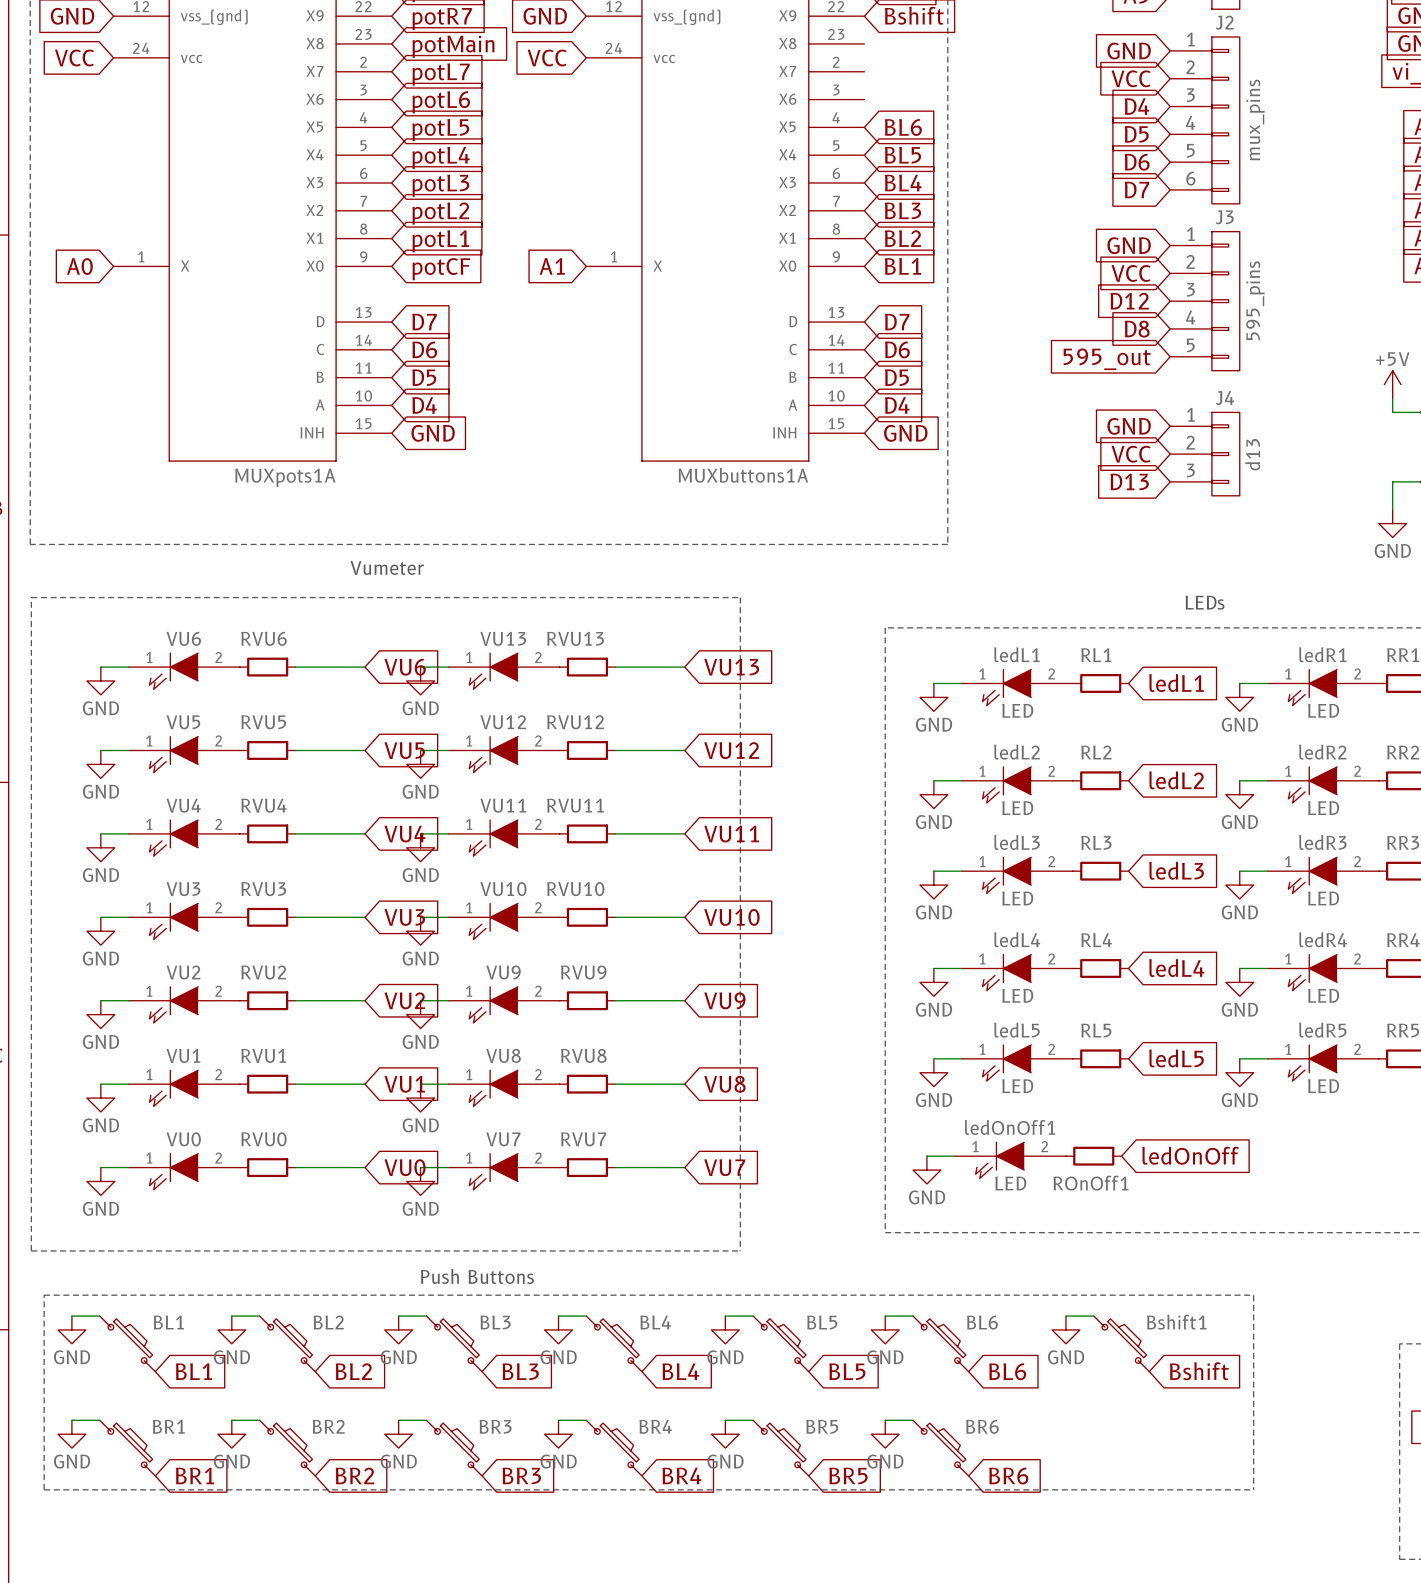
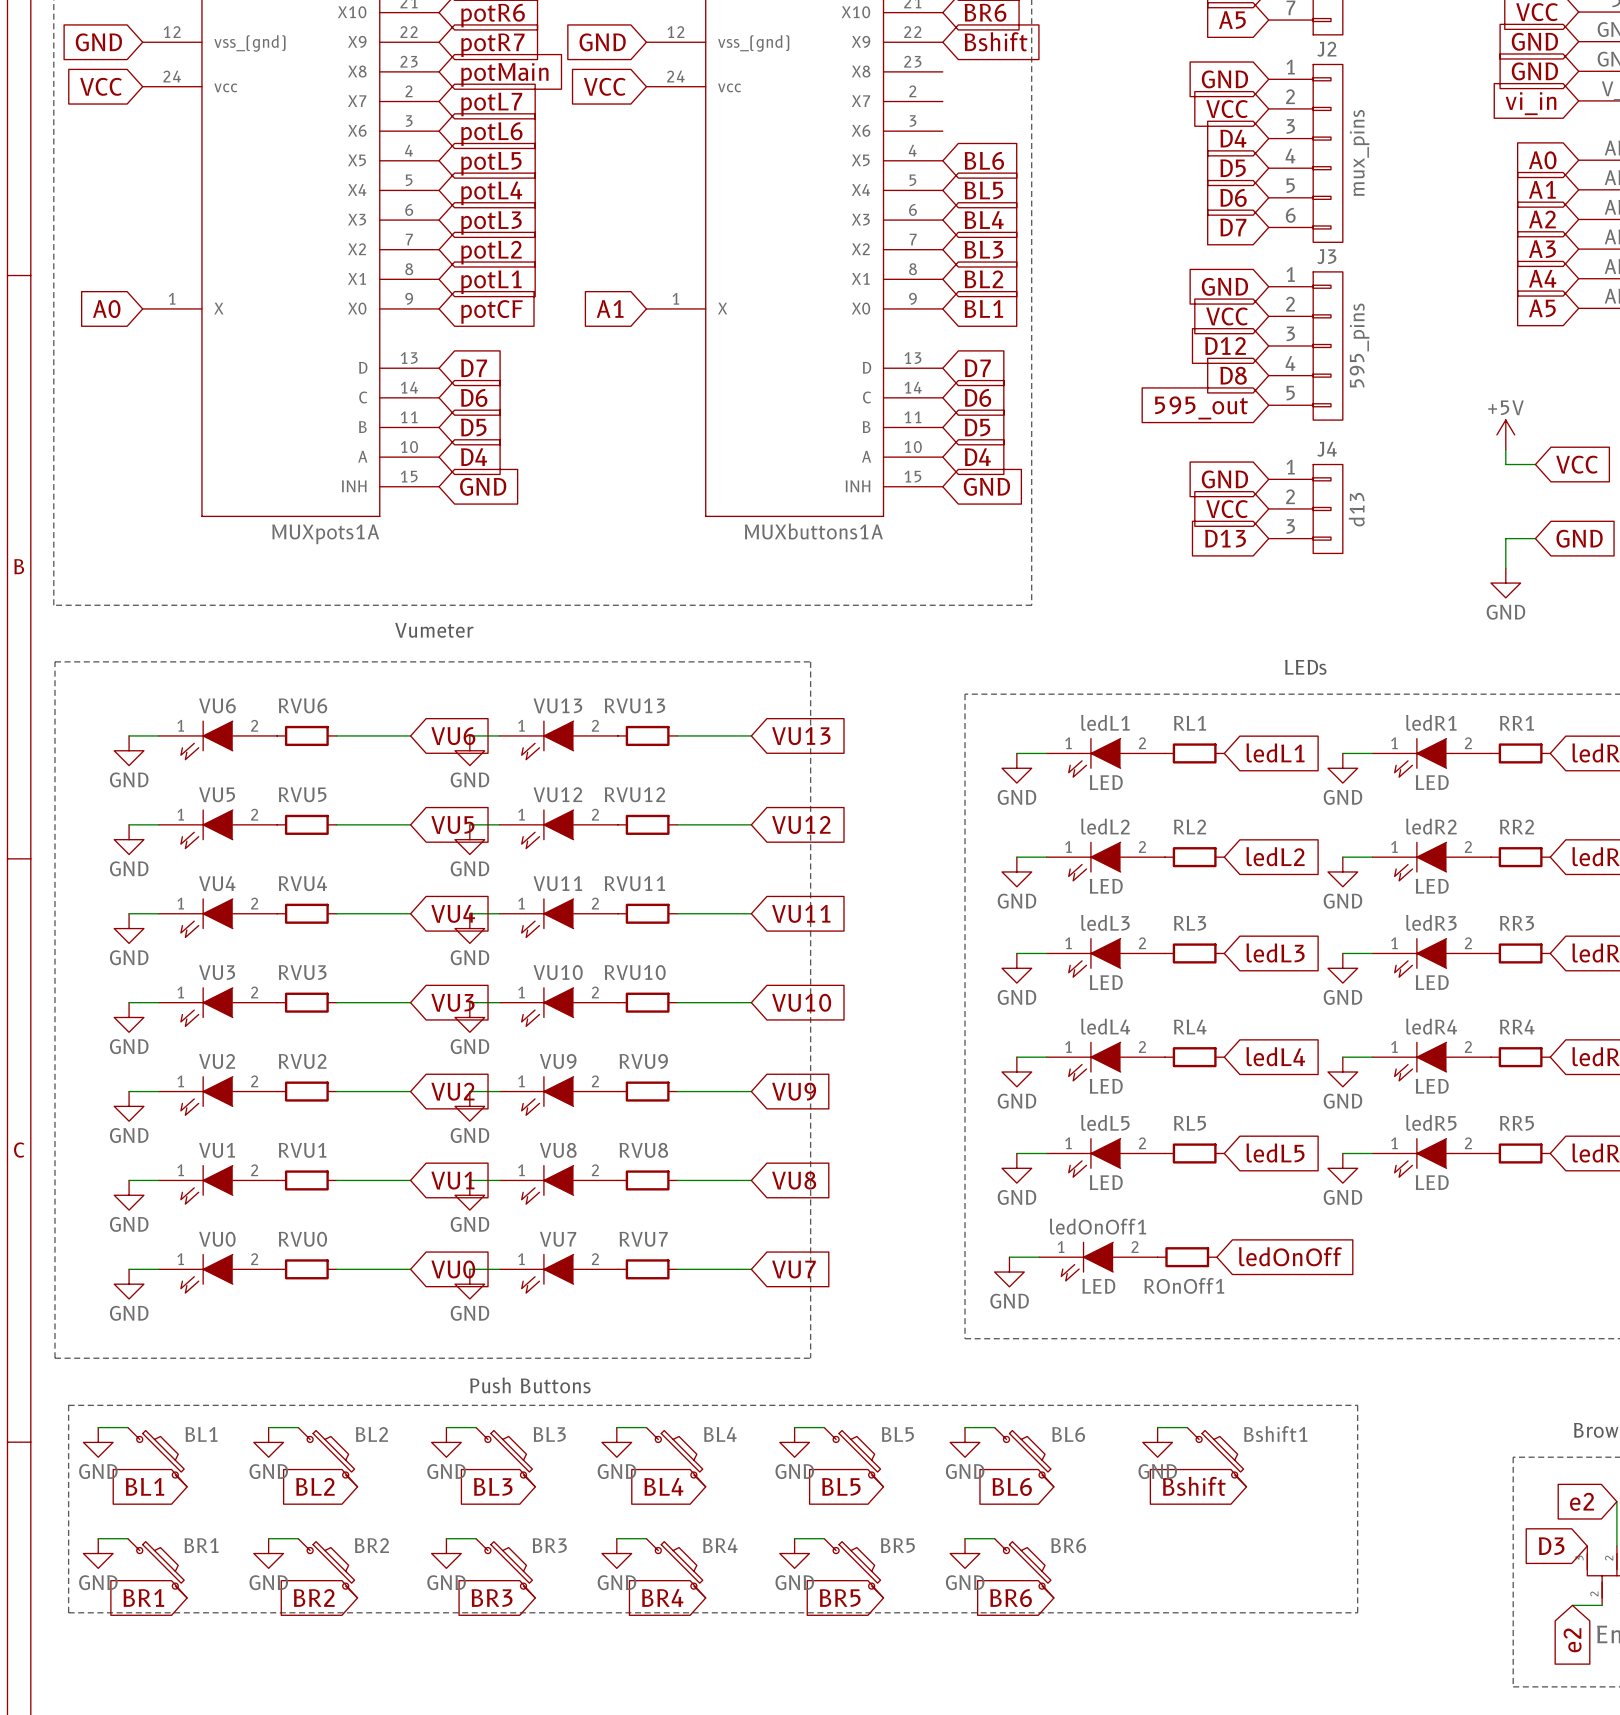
global label rotation: 0° (193, 1371) -> 180° (144, 1486)
global label rotation: 0° (353, 1371) -> 180° (315, 1486)
global label rotation: 0° (520, 1371) -> 180° (493, 1486)
global label rotation: 0° (680, 1371) -> 180° (663, 1486)
global label rotation: 0° (847, 1371) -> 180° (841, 1486)
global label rotation: 0° (1007, 1371) -> 180° (1012, 1486)
global label rotation: 0° (1199, 1371) -> 180° (1194, 1486)
global label rotation: 0° (195, 1475) -> 180° (143, 1597)
global label rotation: 0° (354, 1475) -> 180° (314, 1598)
global label rotation: 0° (521, 1475) -> 180° (492, 1598)
global label rotation: 0° (681, 1475) -> 180° (662, 1597)
global label rotation: 0° (848, 1475) -> 180° (840, 1598)
global label rotation: 0° (1008, 1476) -> 180° (1011, 1598)

